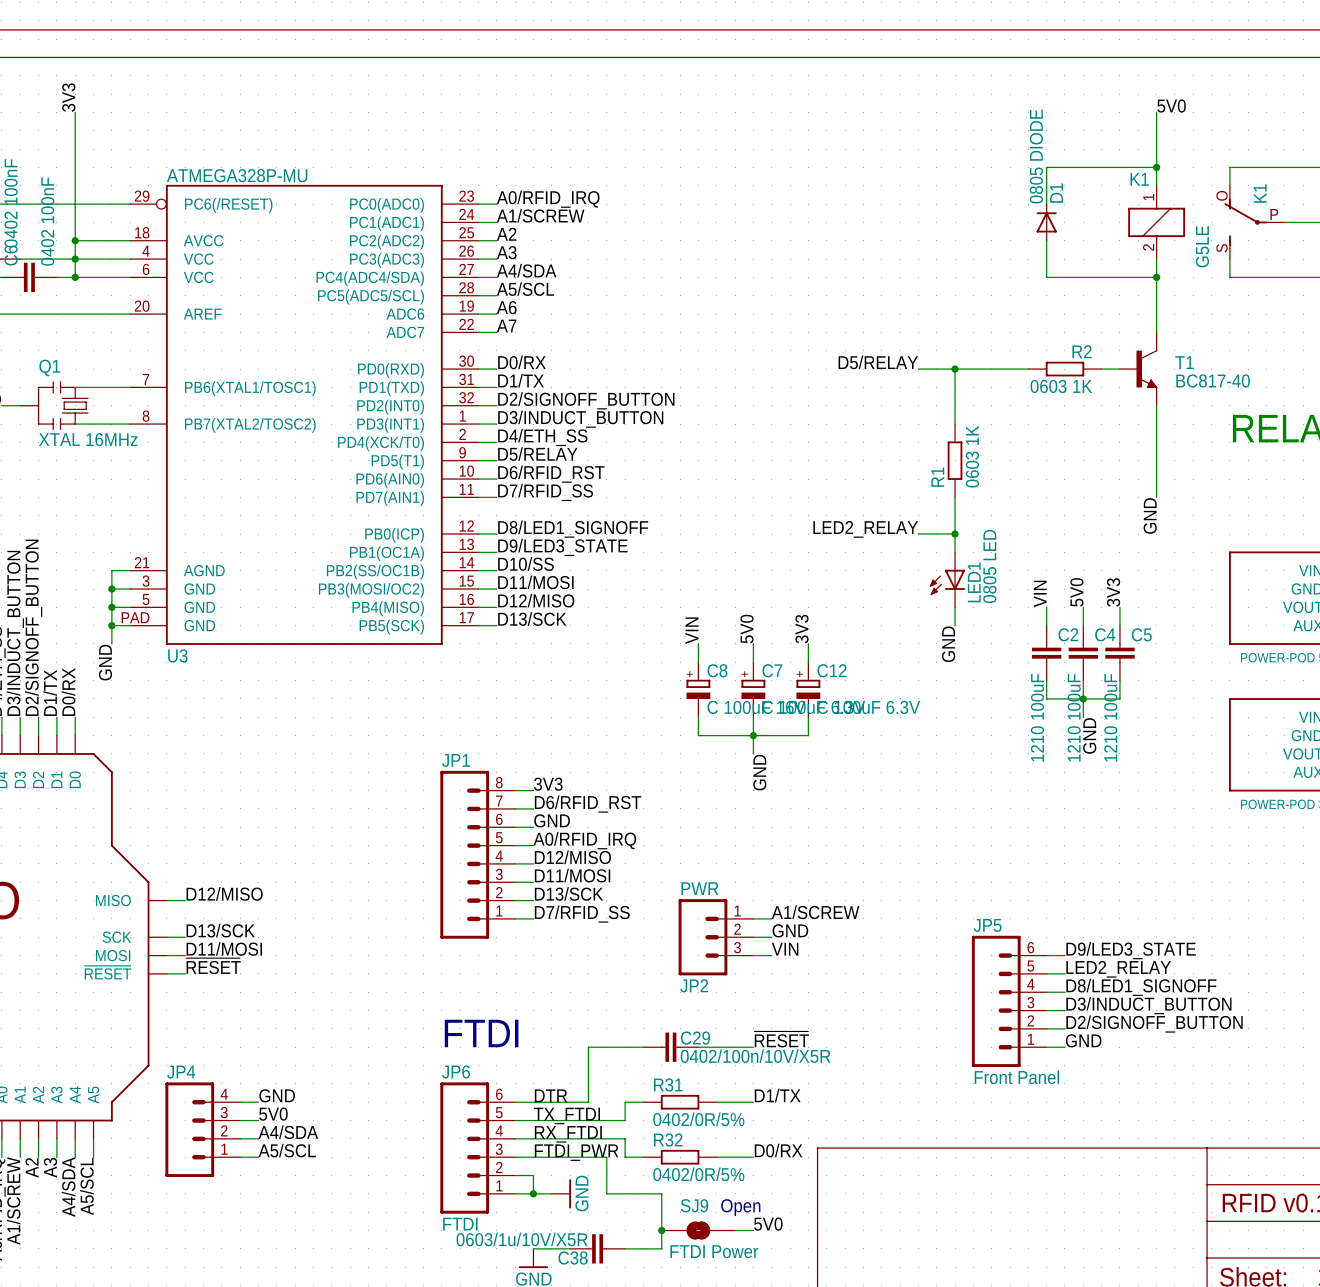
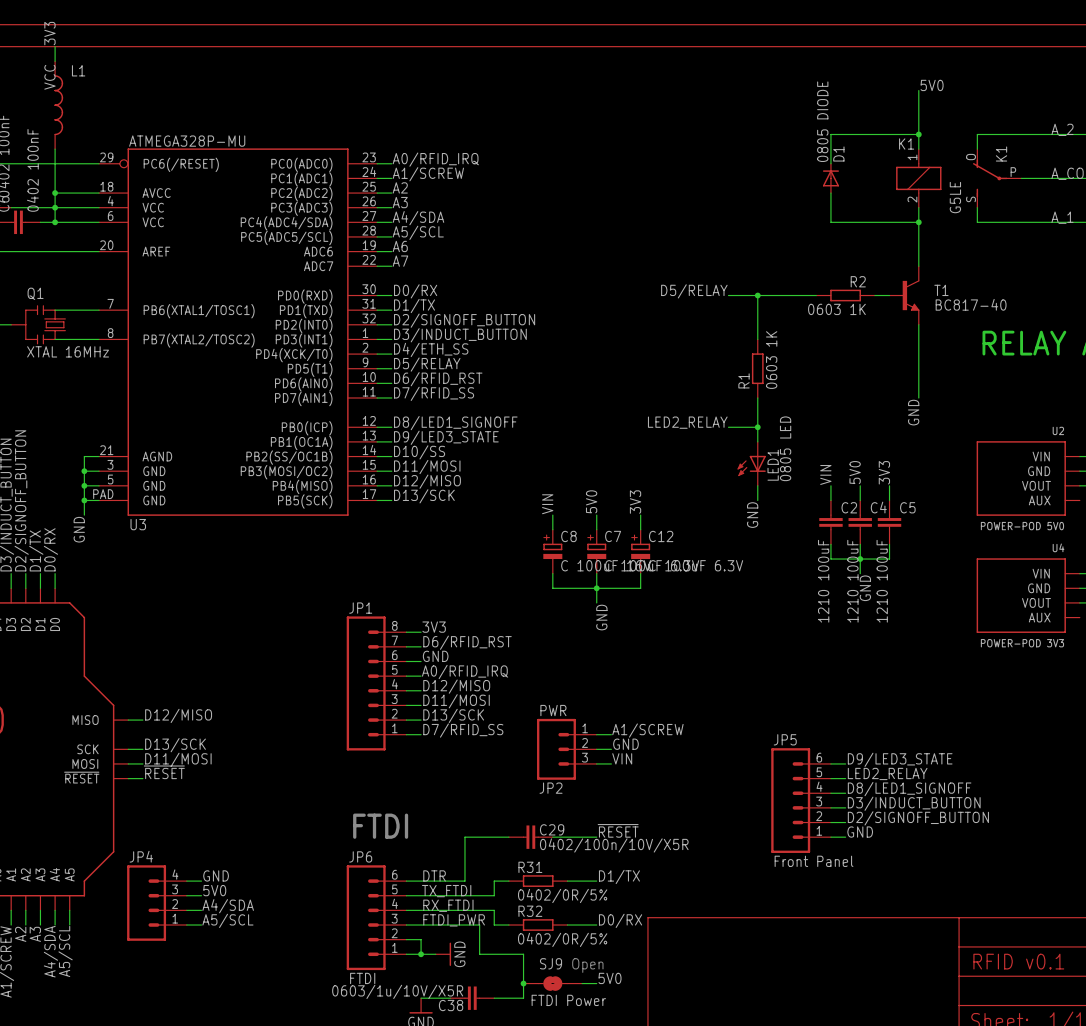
label: none -> 3V3 (49, 33)
wire: none -> (55, 46) (55, 61)
label: 3V3 (68, 97) -> VCC (49, 77)
wire: (75, 112) (75, 185) -> none
L1: none -> (58, 105)

